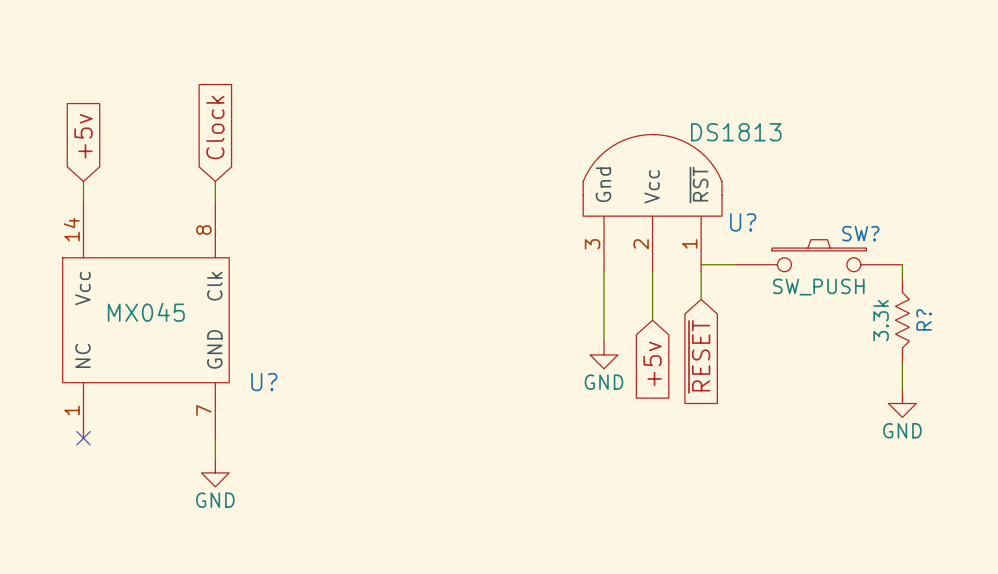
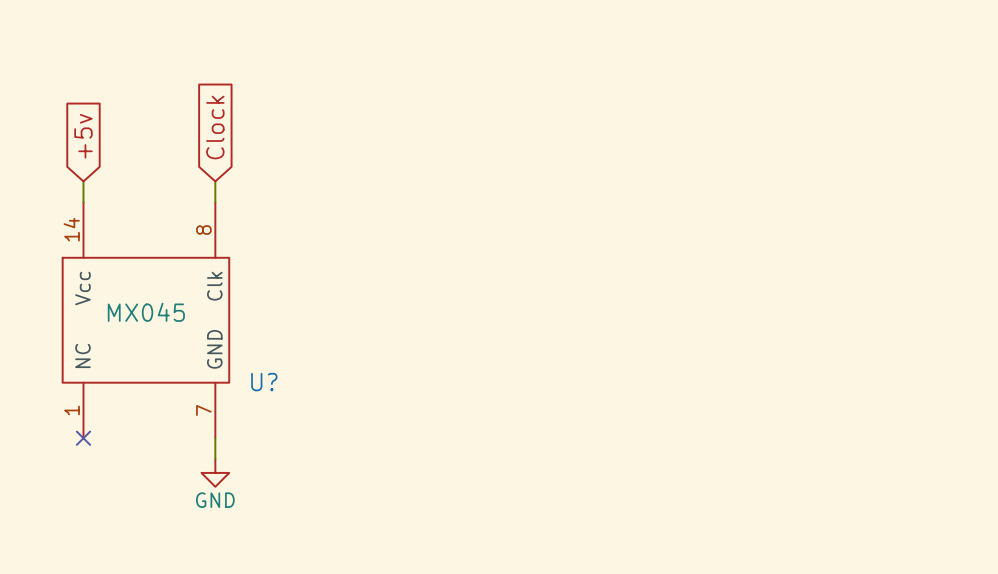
U?: DS1813 (652, 203) -> none
SW?: SW_PUSH (819, 255) -> none
wire: (701, 264) (735, 264) -> none
wire: (902, 264) (902, 278) -> none
wire: (603, 271) (603, 341) -> none
wire: (652, 271) (652, 320) -> none
wire: (701, 271) (701, 299) -> none
R?: 3.3k (902, 320) -> none
power symbol: GND (603, 354) -> none
global label: ~{RESET} (699, 356) -> none
wire: (902, 361) (902, 389) -> none
global label: +5v (652, 363) -> none
power symbol: GND (902, 403) -> none

